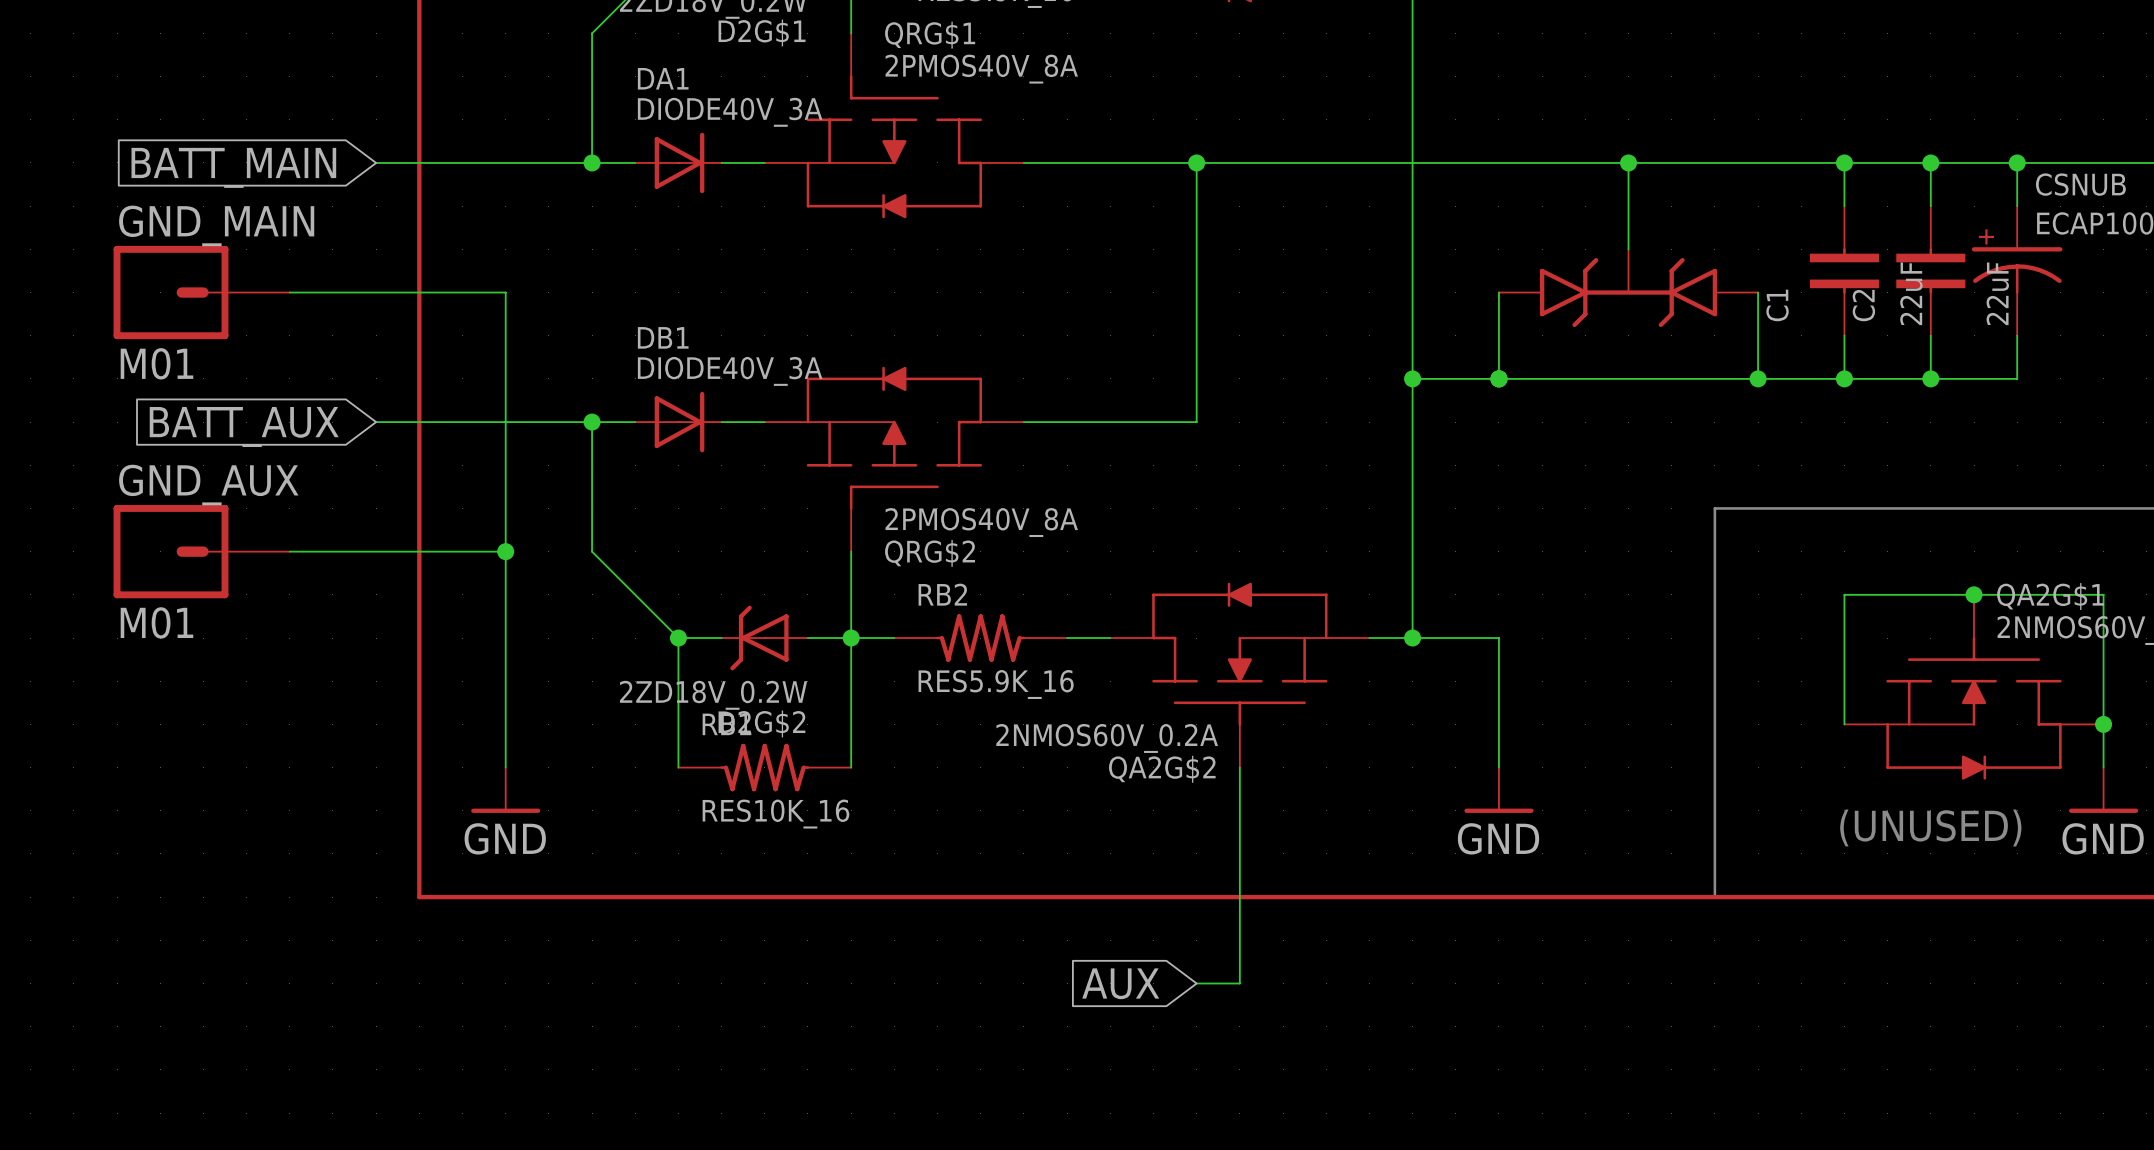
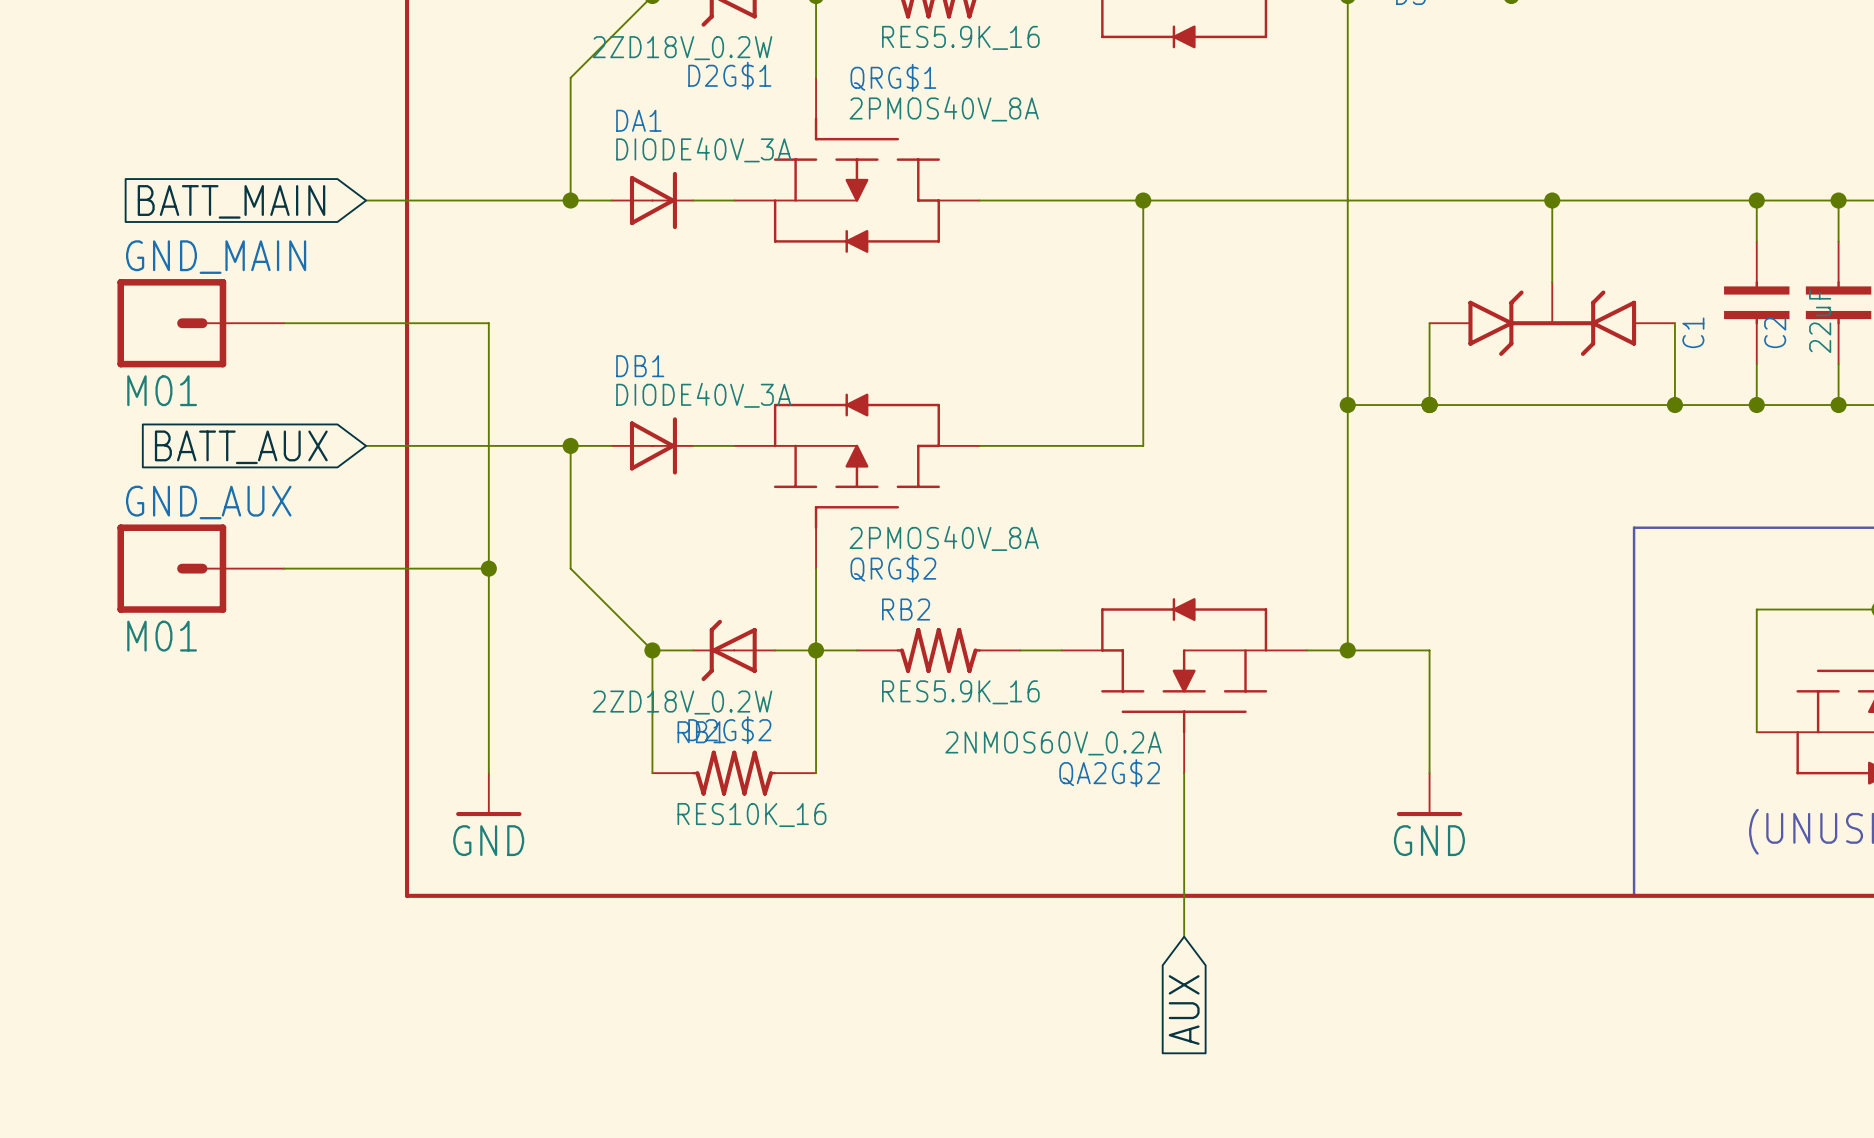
wire: (1239, 940) (1239, 983) (1196, 983) -> none
global label rotation: 0° (1120, 983) -> 90° counterclockwise (1184, 1010)

